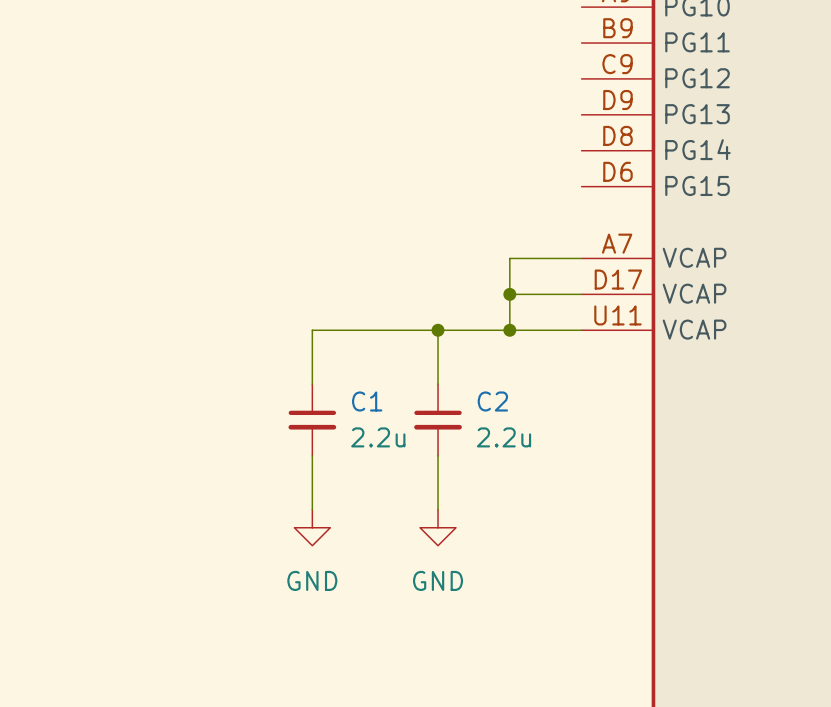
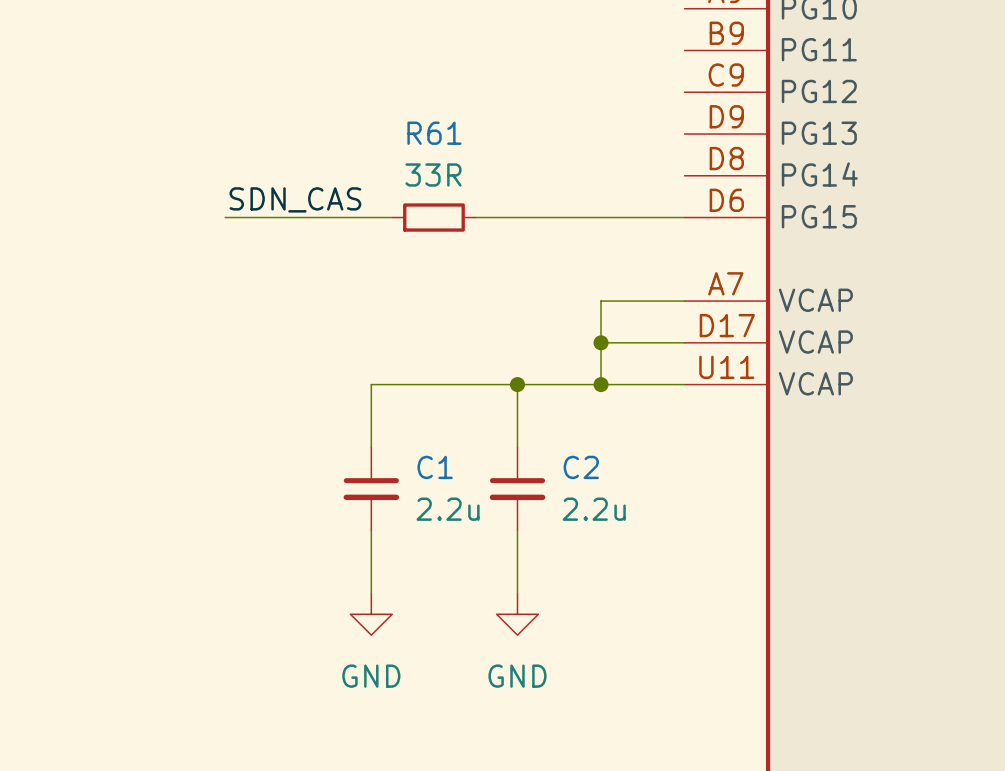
label: none -> SDN_CAS (295, 199)
wire: none -> (225, 217) (392, 217)
R61: none -> 33R (433, 217)
wire: none -> (475, 217) (684, 217)

